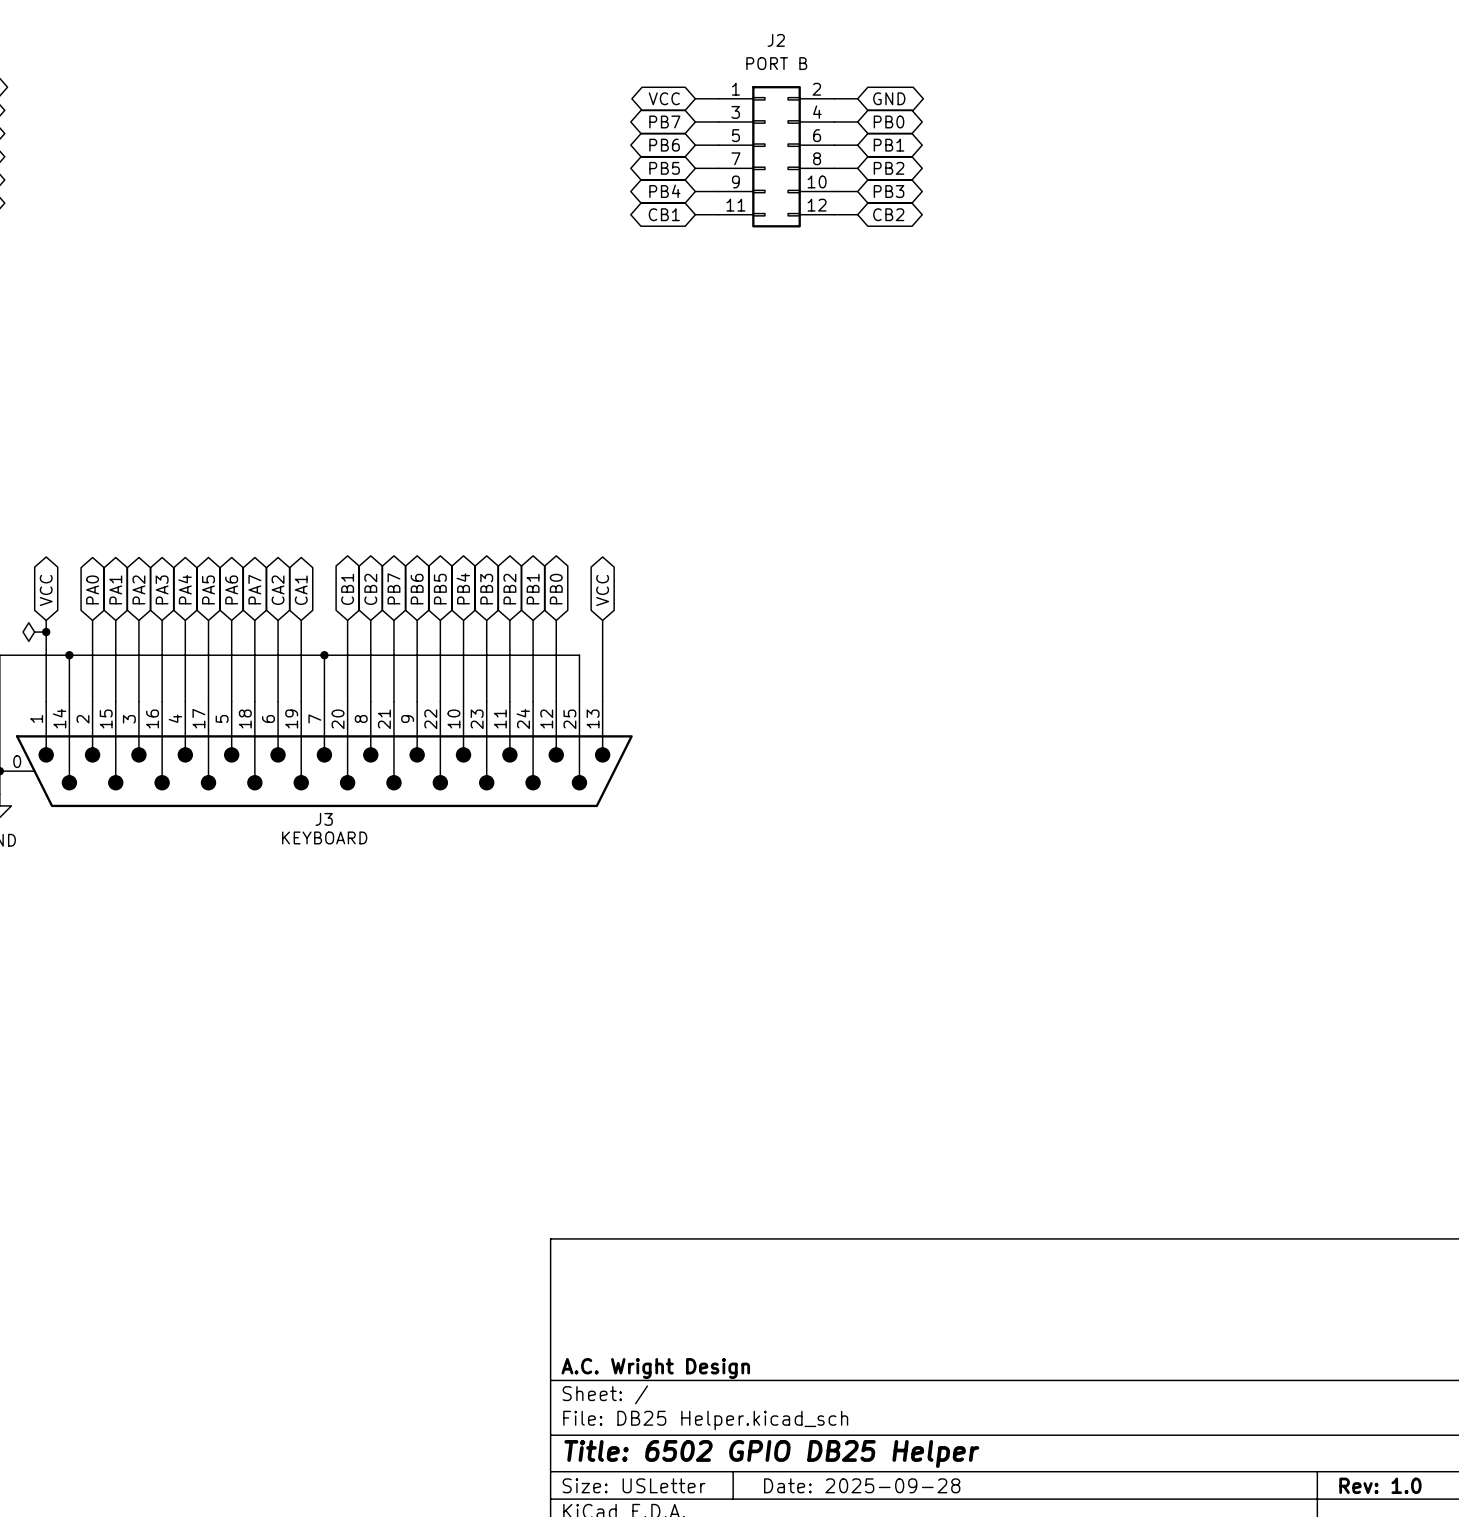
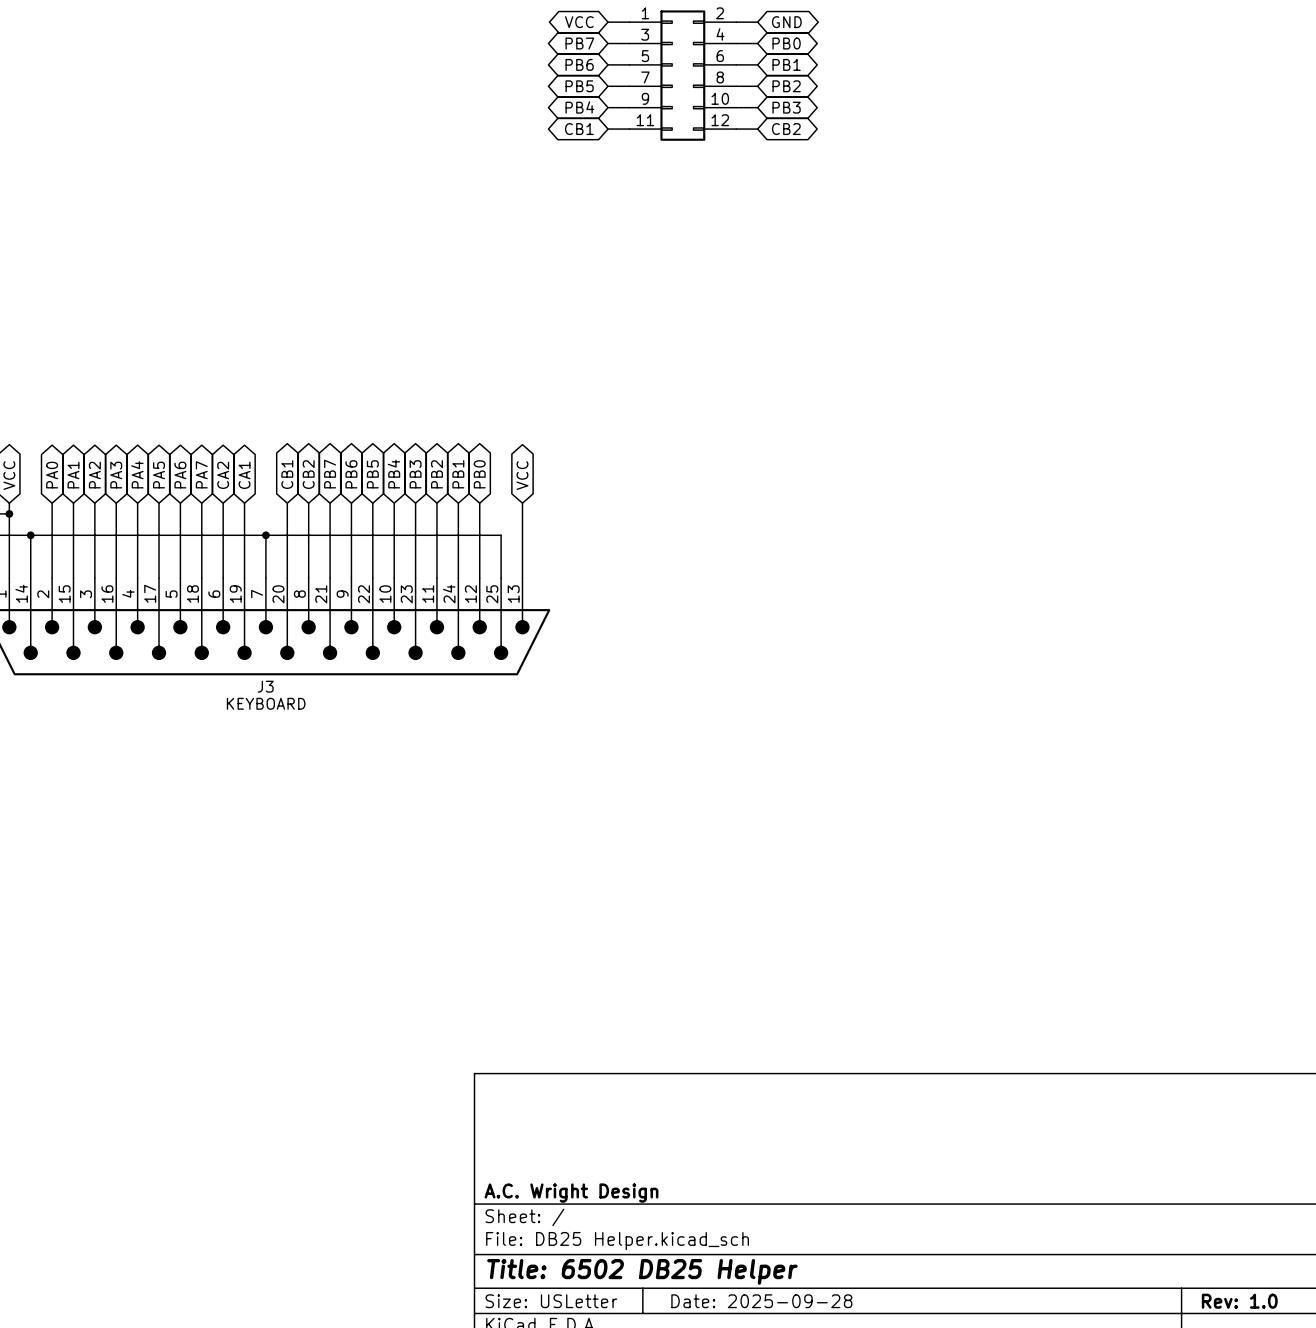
title block: Title: 6502 GPIO DB25 Helper (771, 1453) -> Title: 6502 DB25 Helper (642, 1271)

